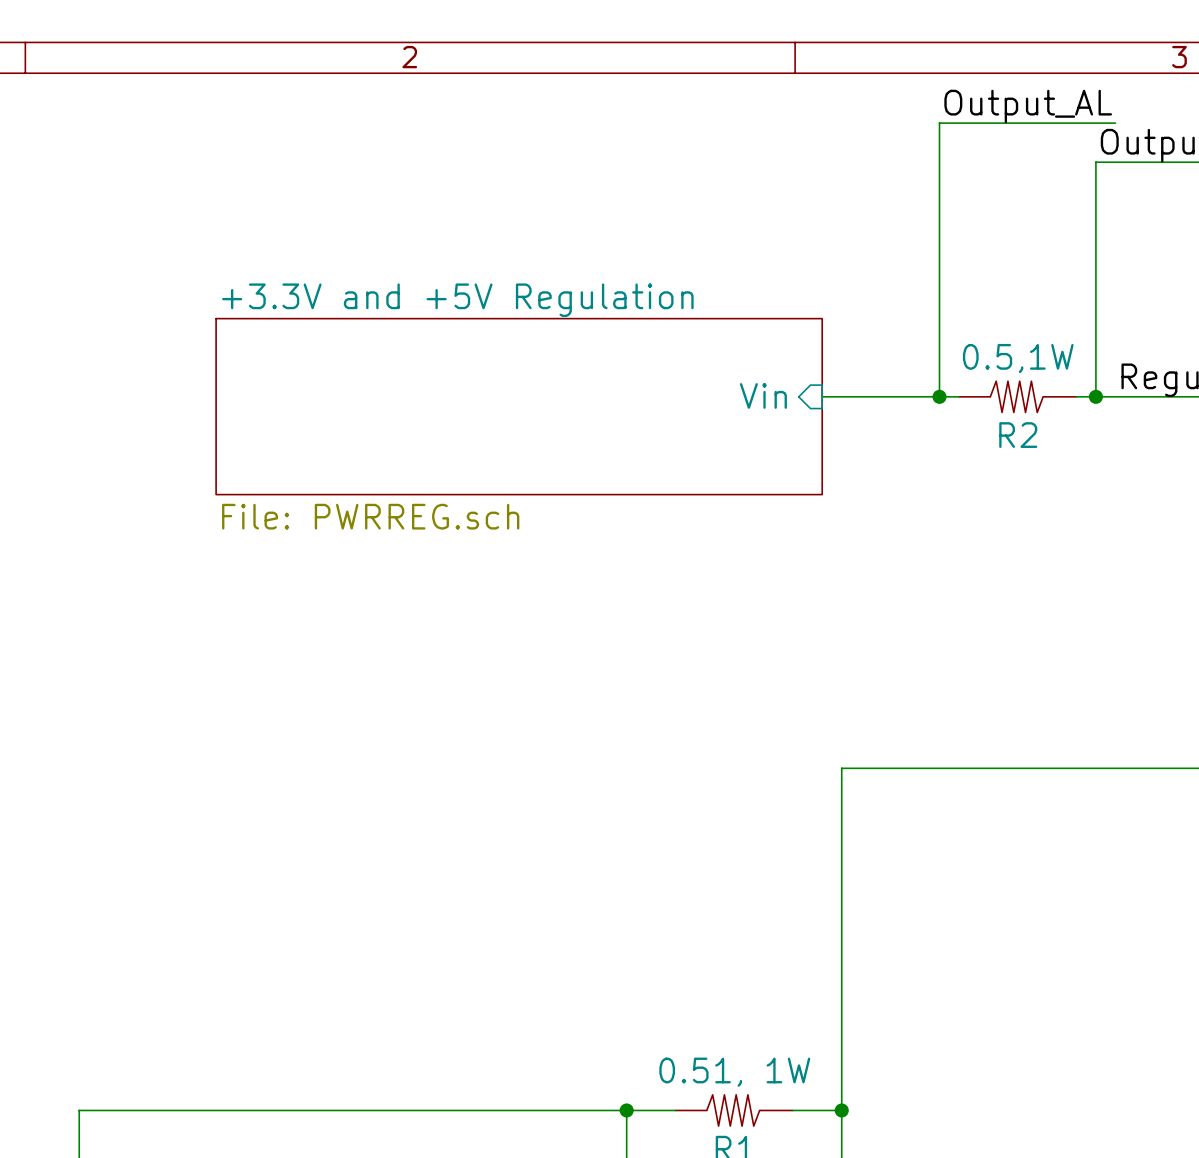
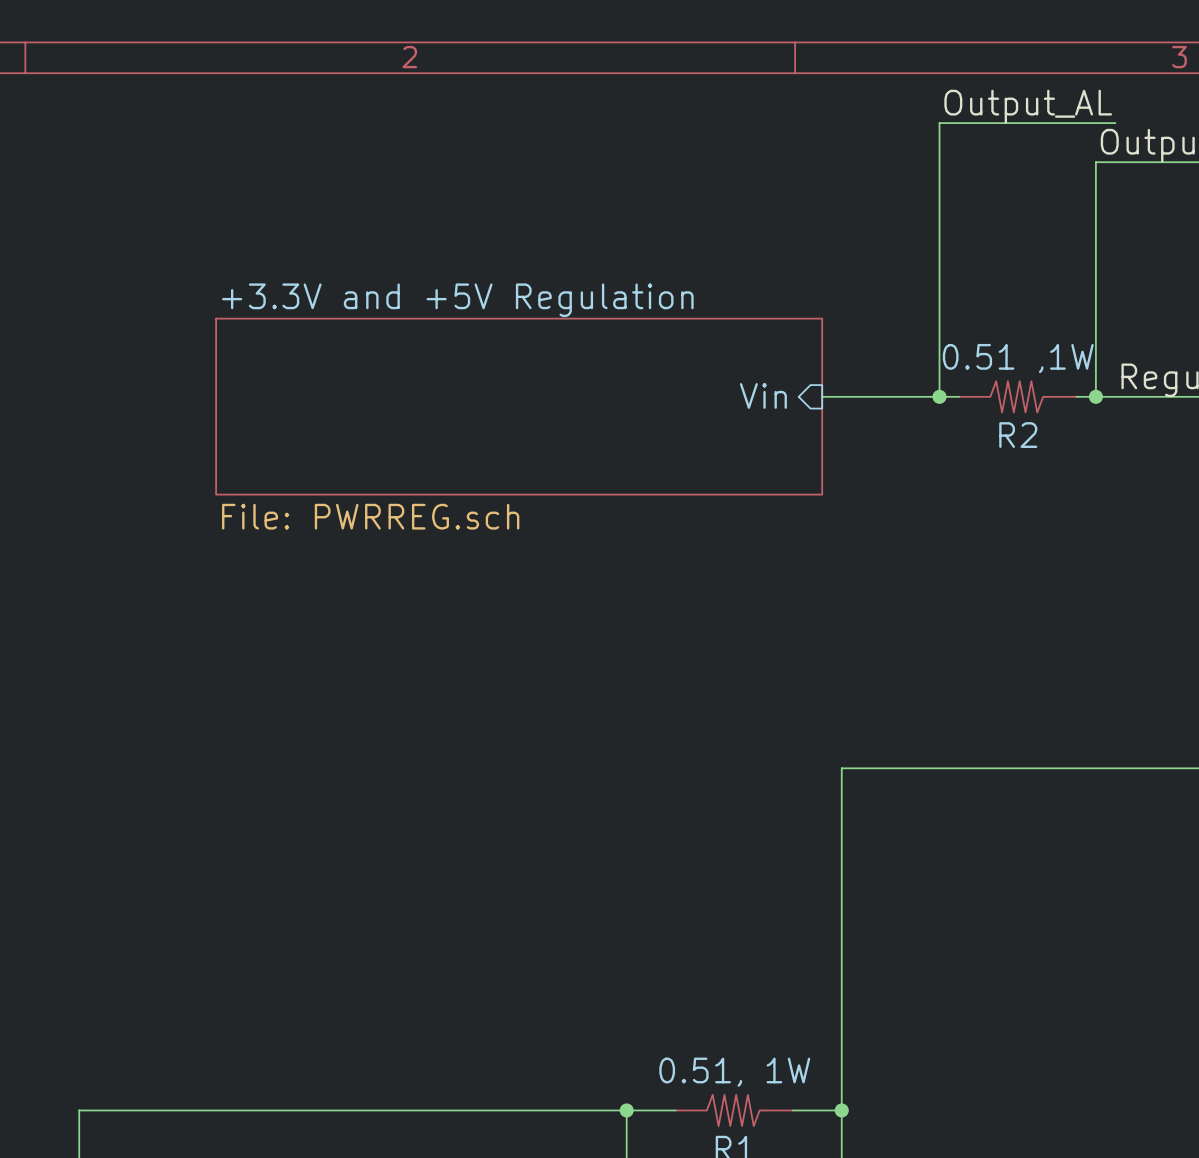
R2 value: 0.5,1W (1018, 358) -> 0.51 ,1W (1018, 358)

